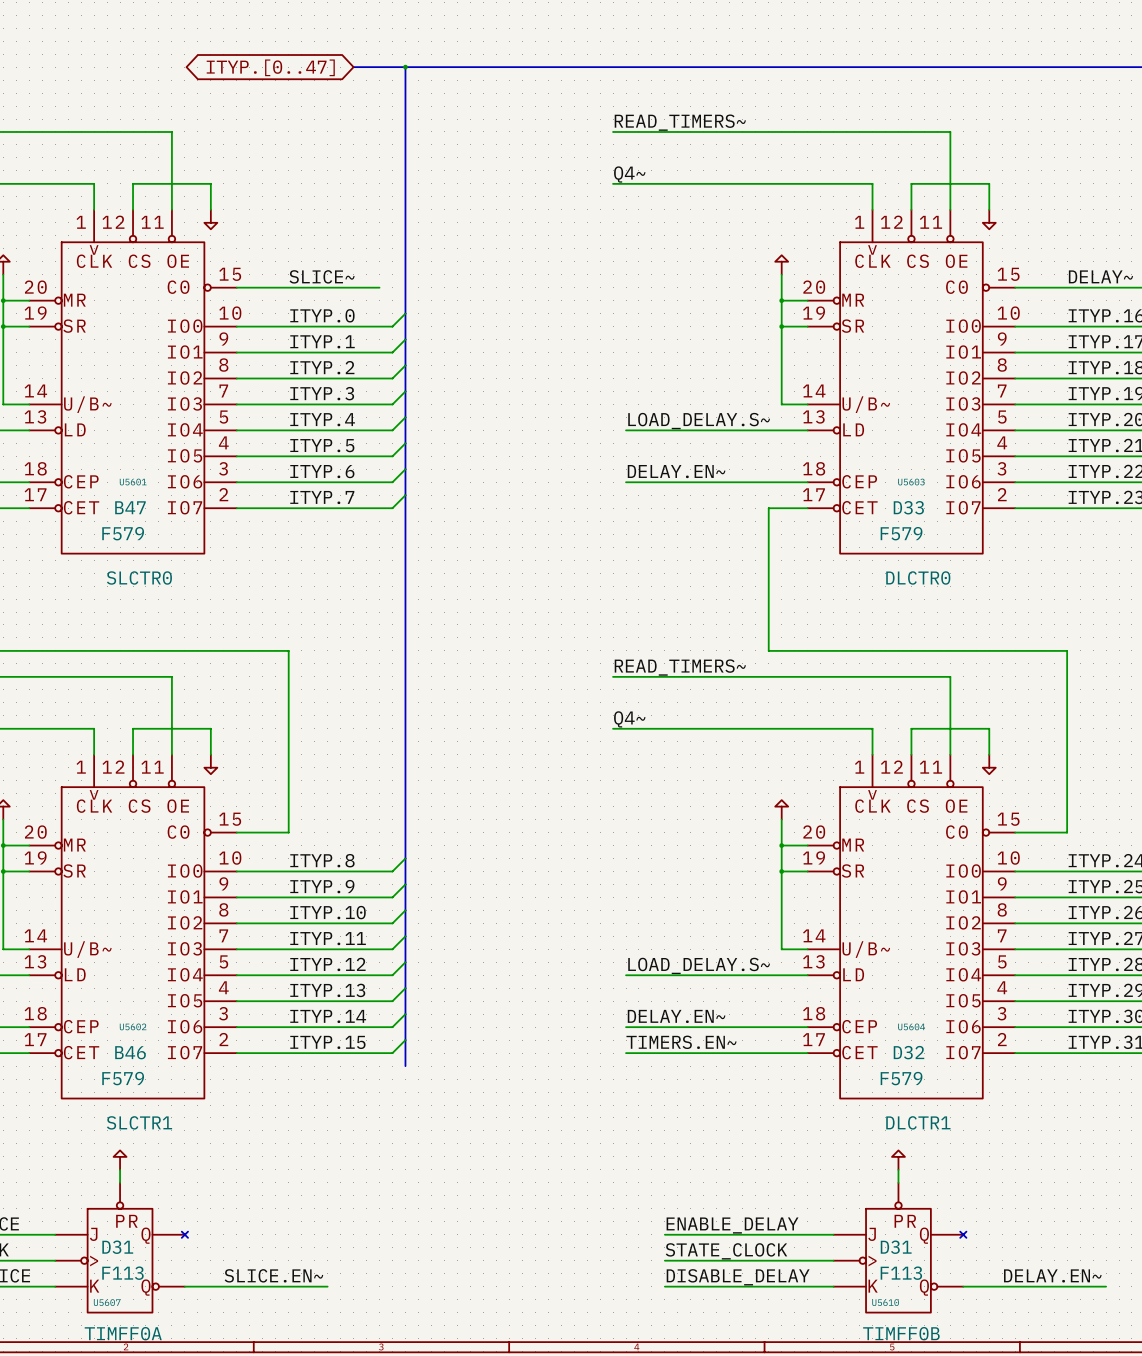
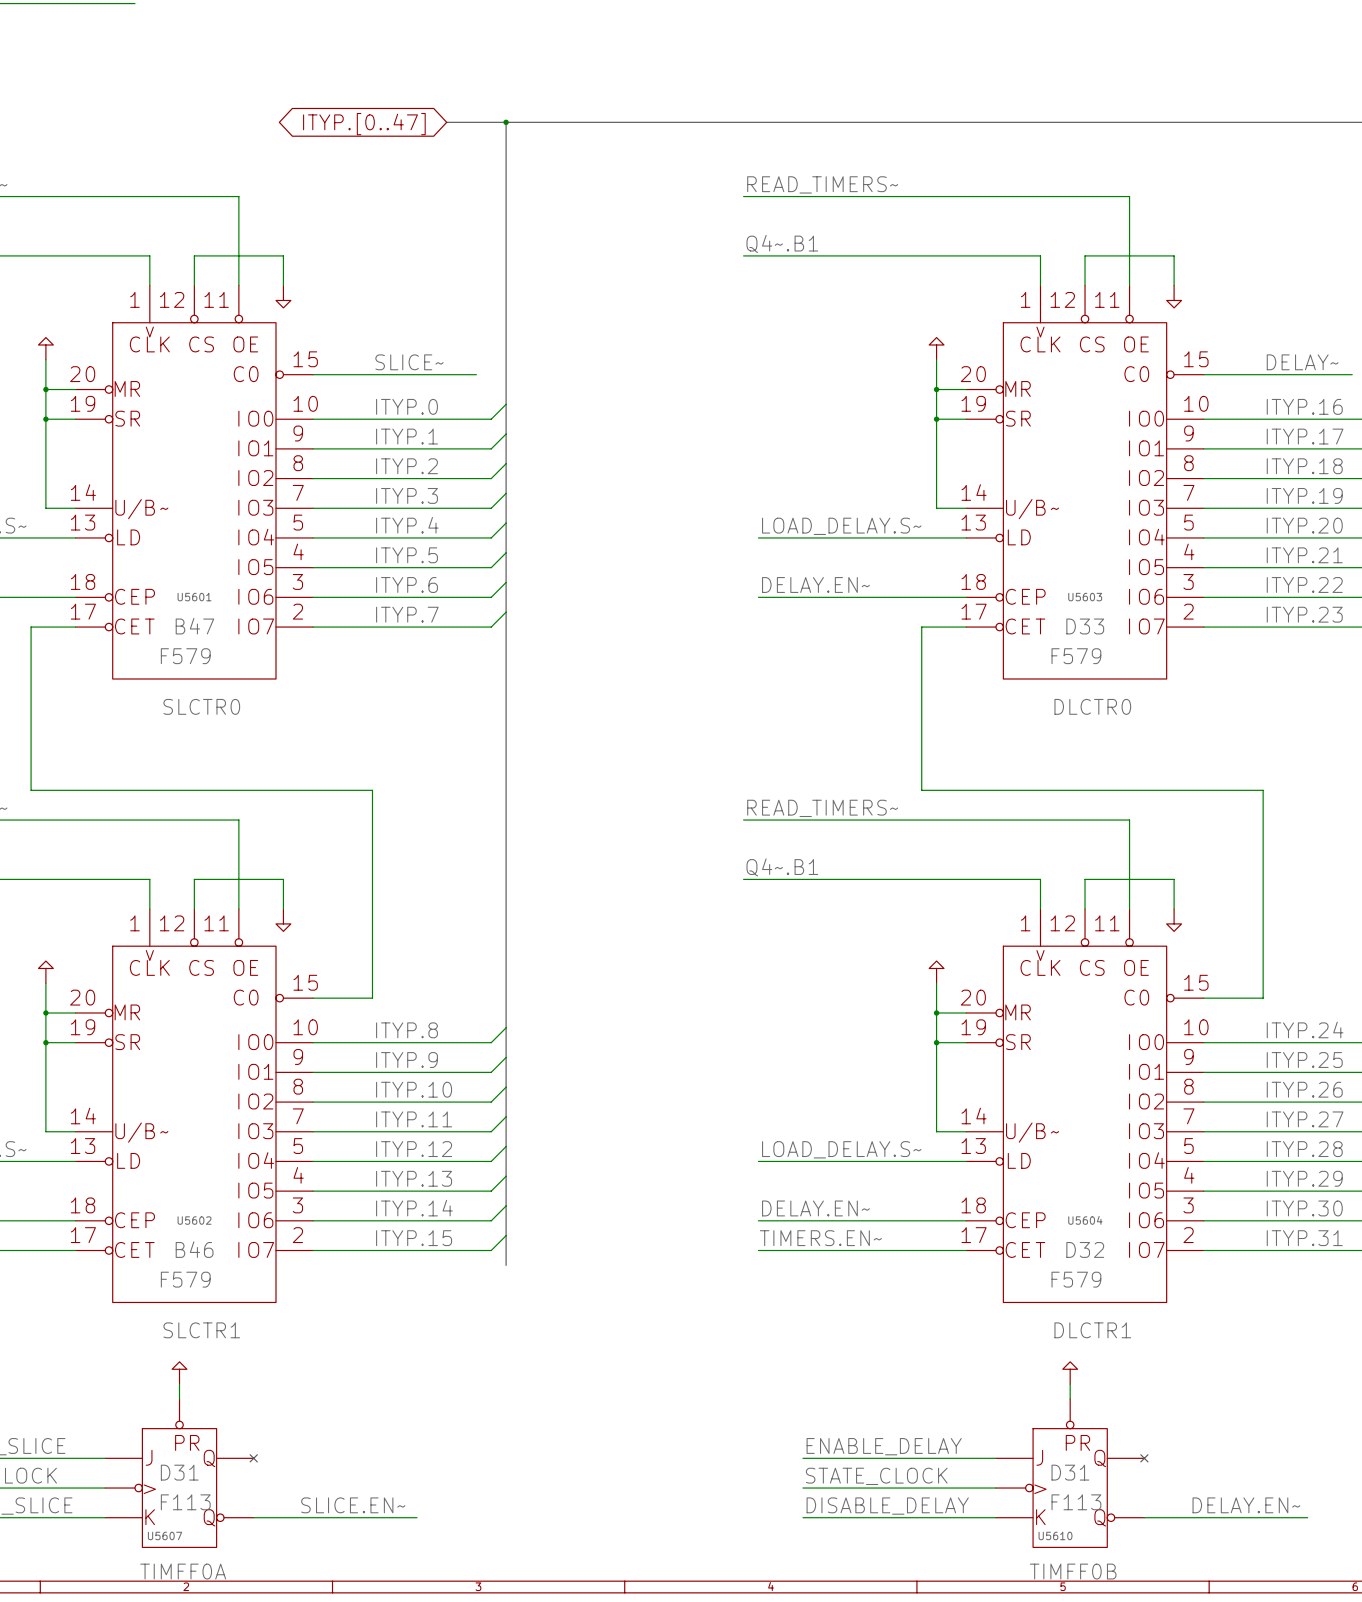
label: Q4~ (629, 174) -> Q4~.B1 (782, 243)
label: Q4~ (629, 719) -> Q4~.B1 (782, 867)

